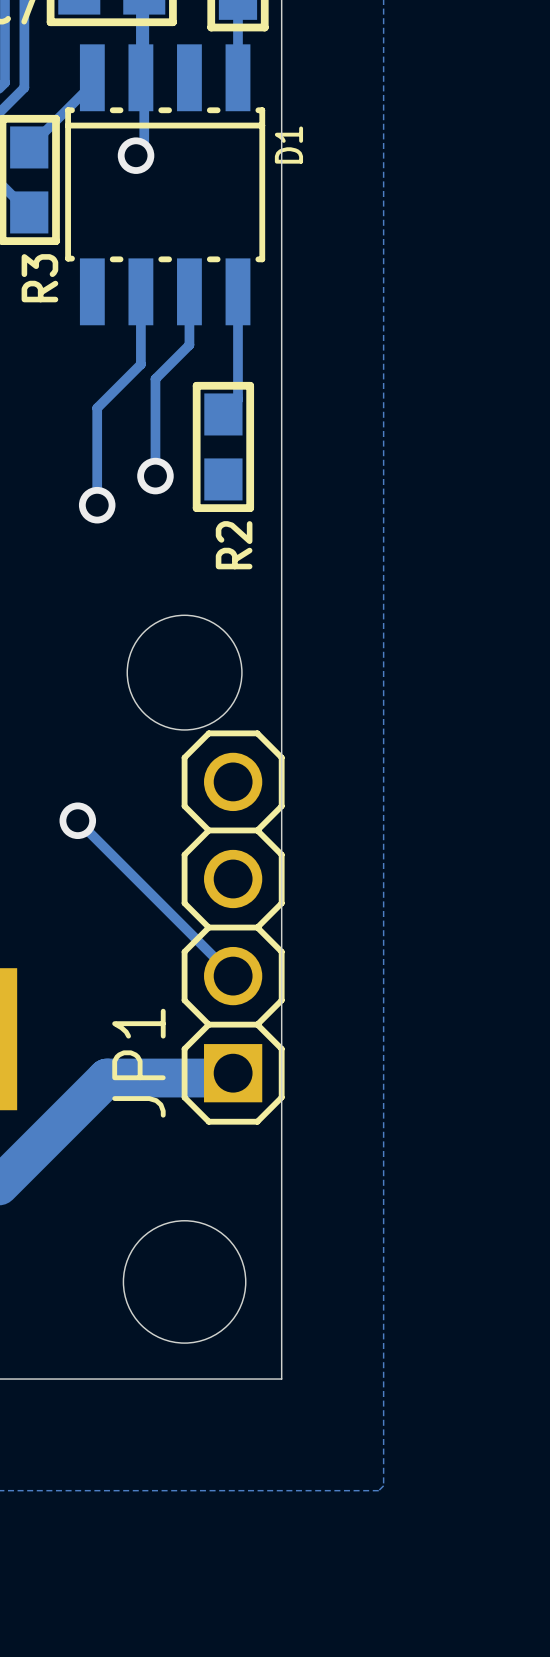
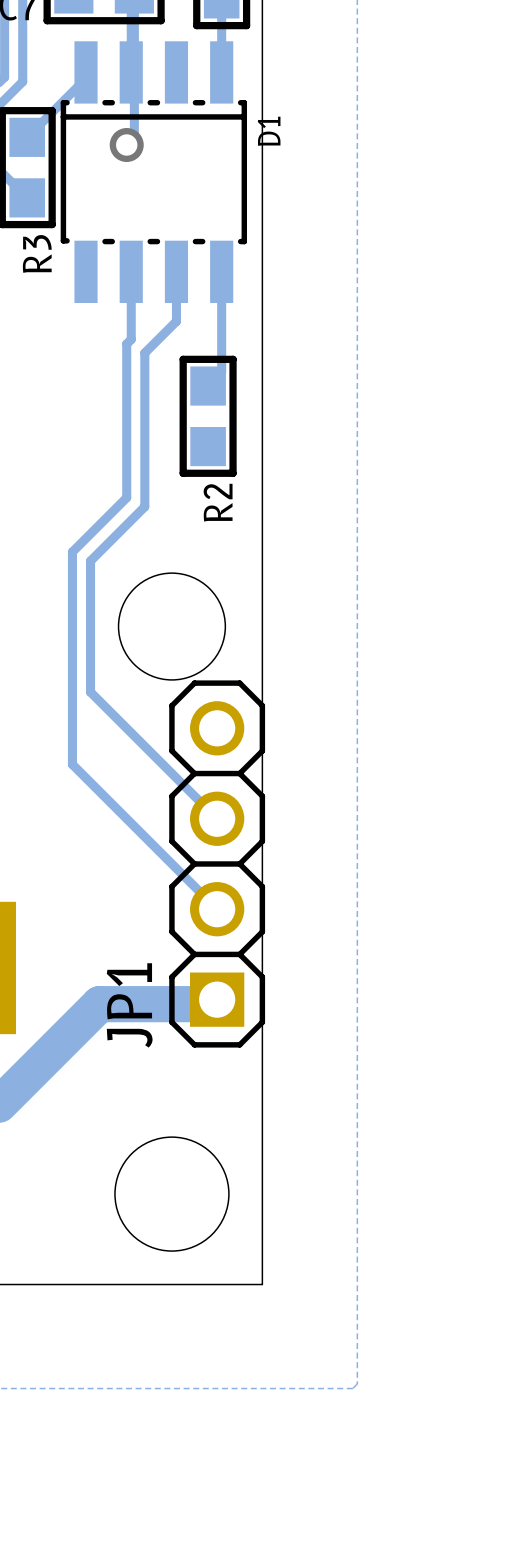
track: (136, 369) (97, 408) (97, 505) -> (126, 343) (126, 497) (72, 551) (72, 764)
track: none -> (144, 443) (144, 506) (90, 561) (90, 692) (217, 818)
via: (155, 476) -> none
via: (97, 505) -> none
via: (77, 820) -> none

